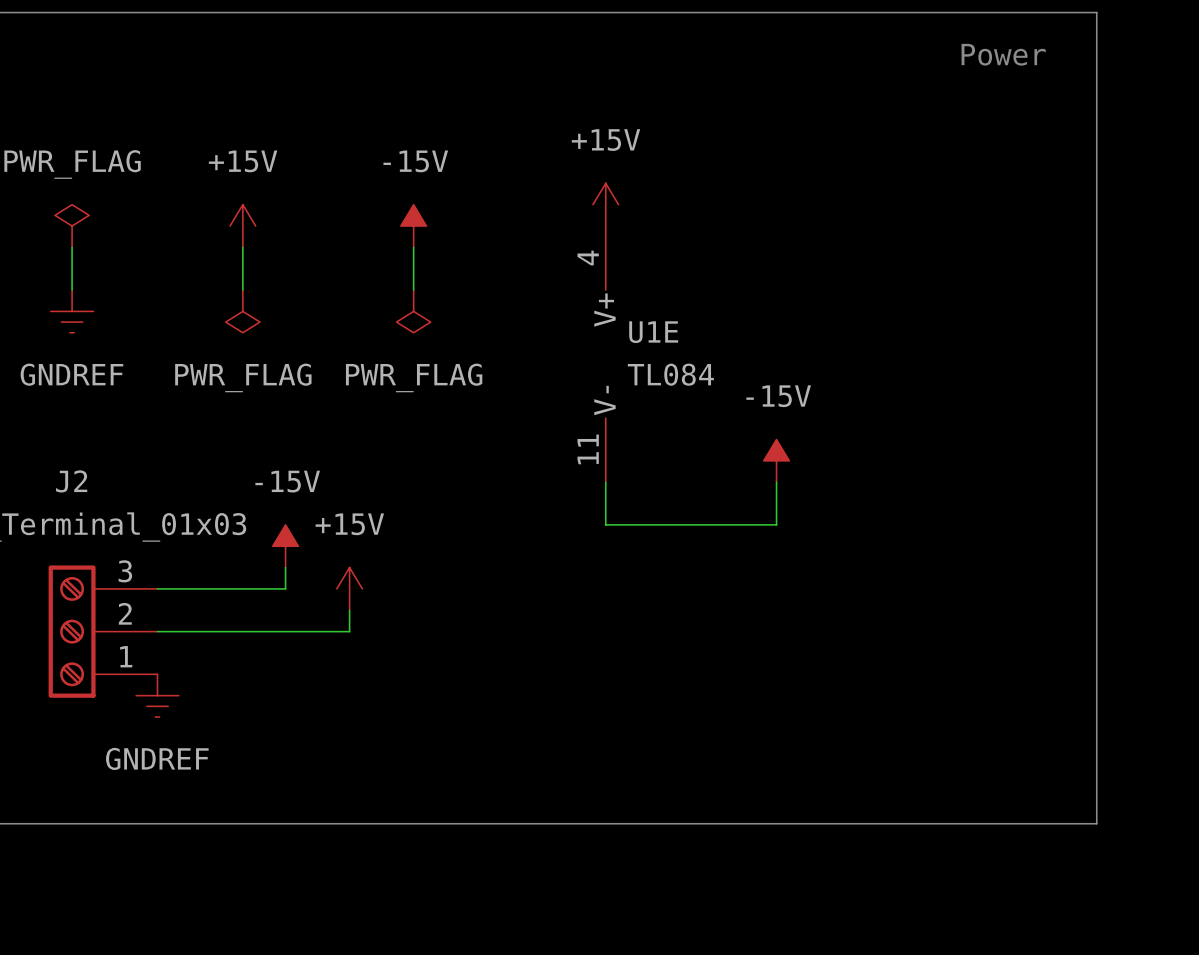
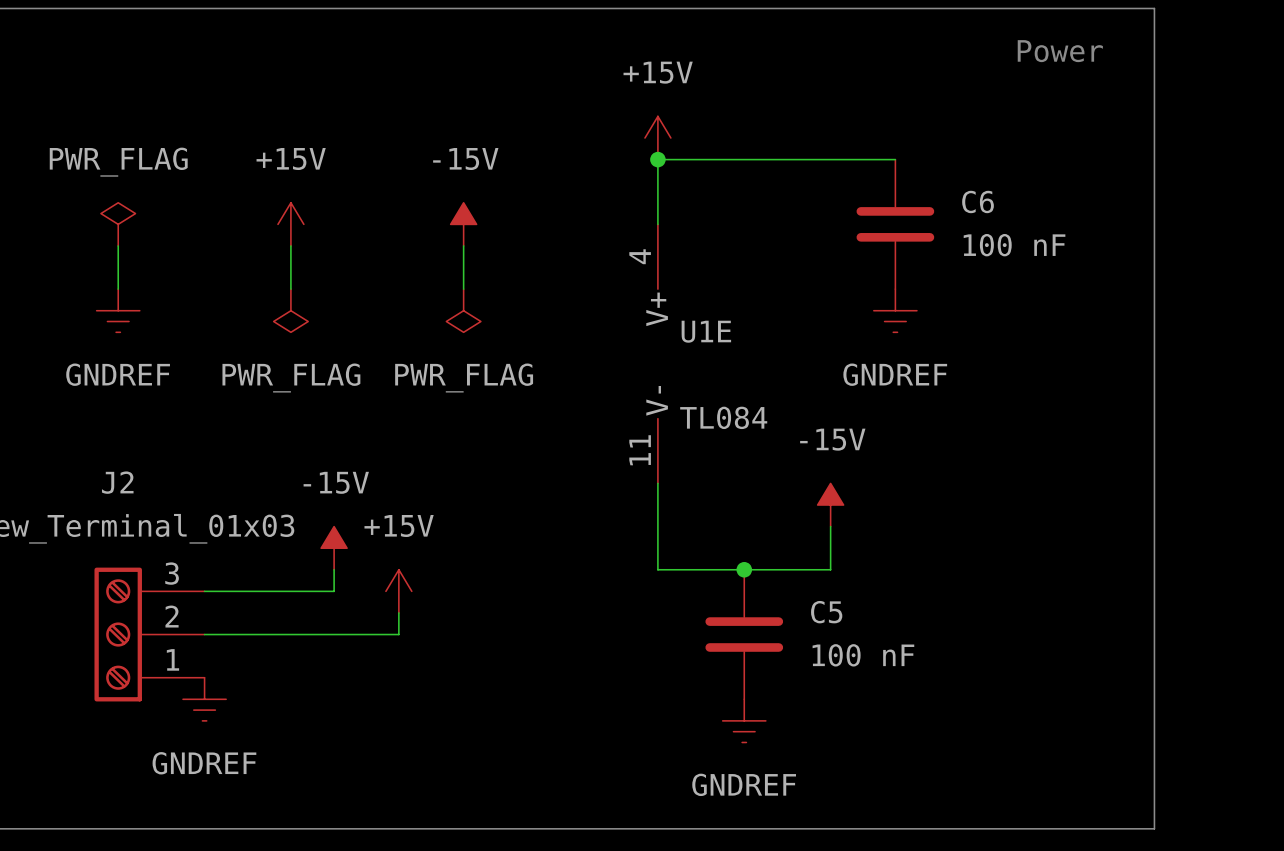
junction: none -> (657, 159)
wire: none -> (895, 159) (657, 159) (657, 224)
power symbol position: +15V (605, 204) -> +15V (657, 138)
C6: none -> 100 nF (895, 224)
power symbol: none -> GNDREF (895, 310)
U1E value position: TL084 (670, 374) -> TL084 (723, 417)
power symbol position: -15V (776, 460) -> -15V (830, 505)
wire: (776, 482) (776, 524) (605, 524) -> (830, 526) (830, 569) (657, 569) (657, 526)
junction: none -> (744, 569)
C5: none -> 100 nF (744, 634)
power symbol: none -> GNDREF (744, 720)

